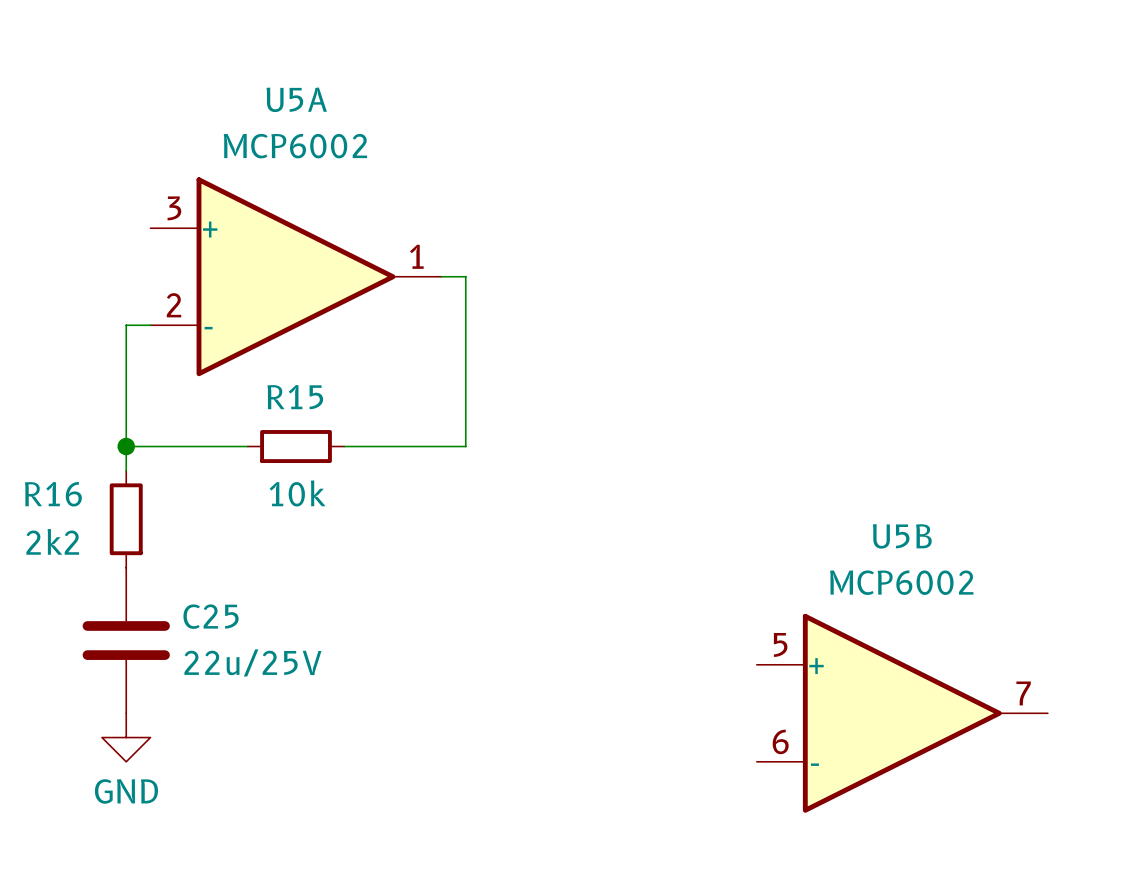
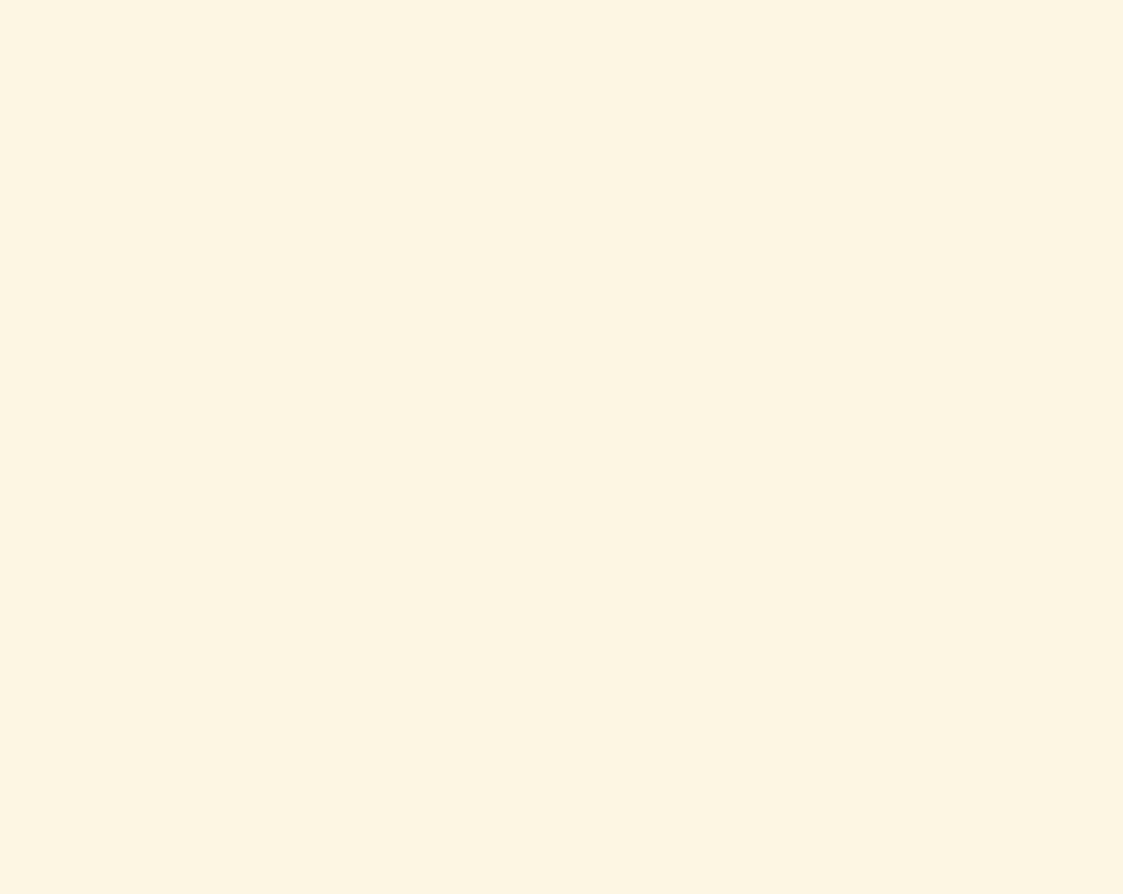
U5A: MCP6002 (296, 276) -> none
wire: (441, 276) (465, 276) (465, 446) (344, 446) -> none
wire: (150, 325) (126, 325) (126, 470) -> none
wire: (126, 446) (247, 446) -> none
junction: (126, 446) -> none
R15: 10k (296, 446) -> none
R16: 2k2 (126, 519) -> none
C25: 22u/25V (126, 640) -> none
U5B: MCP6002 (902, 713) -> none
power symbol: GND (126, 737) -> none

